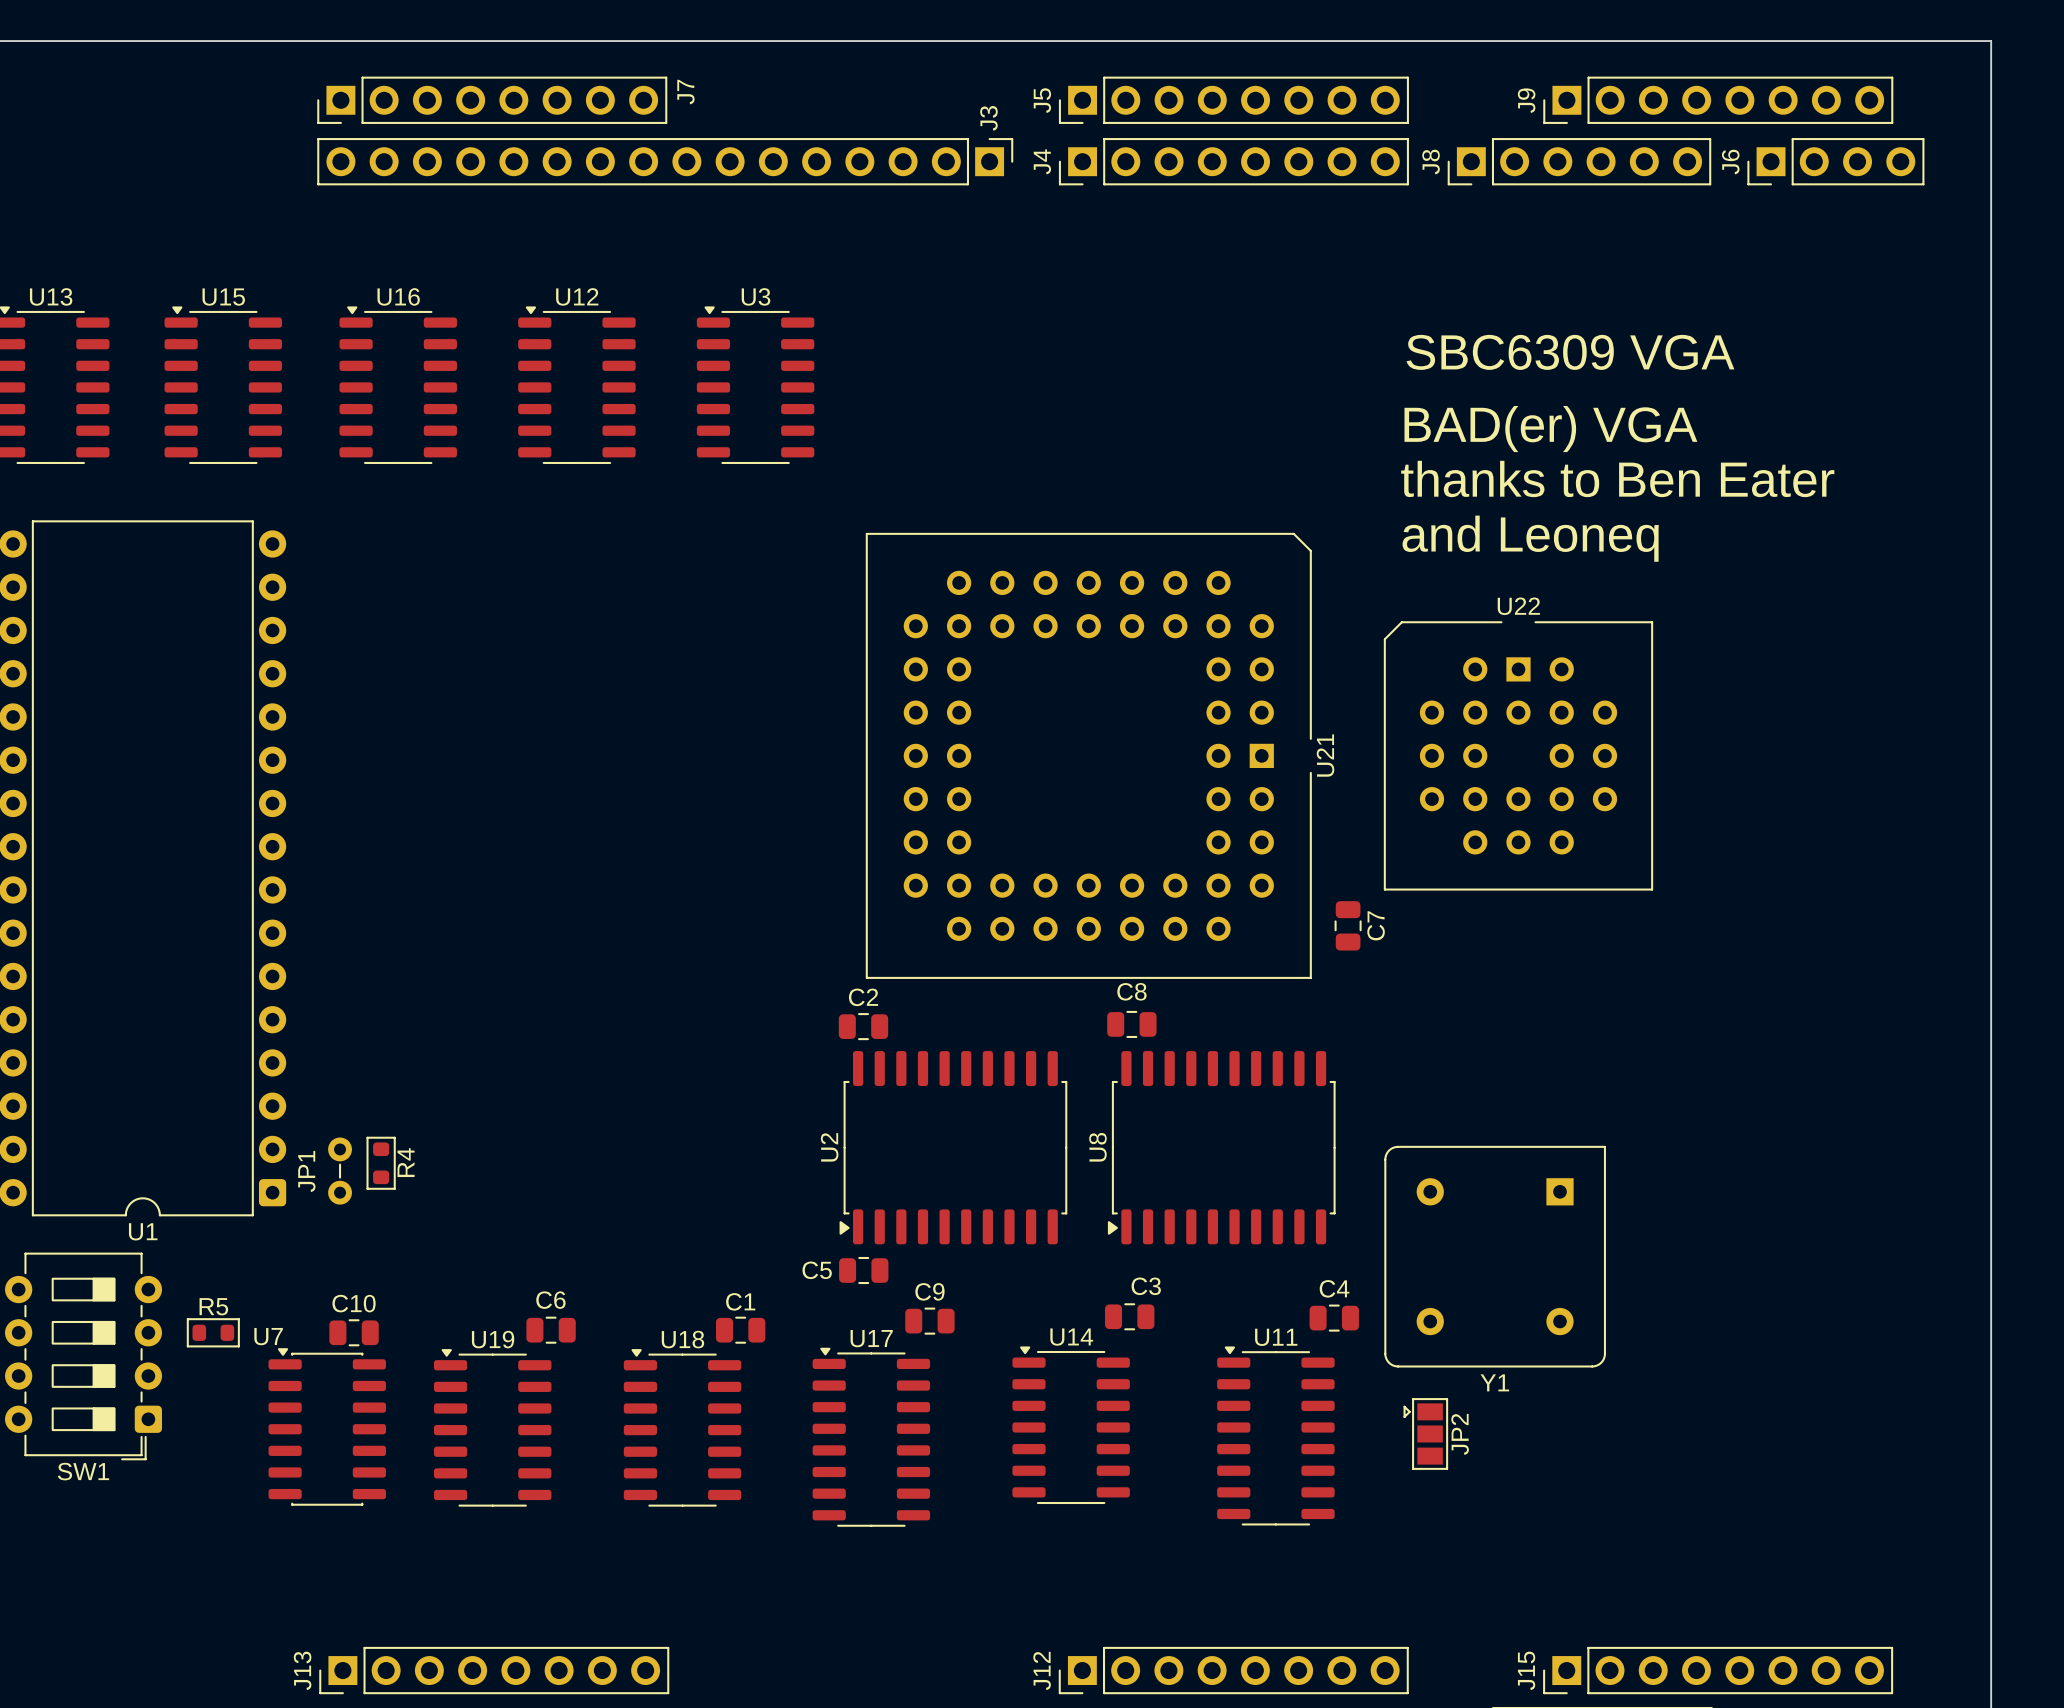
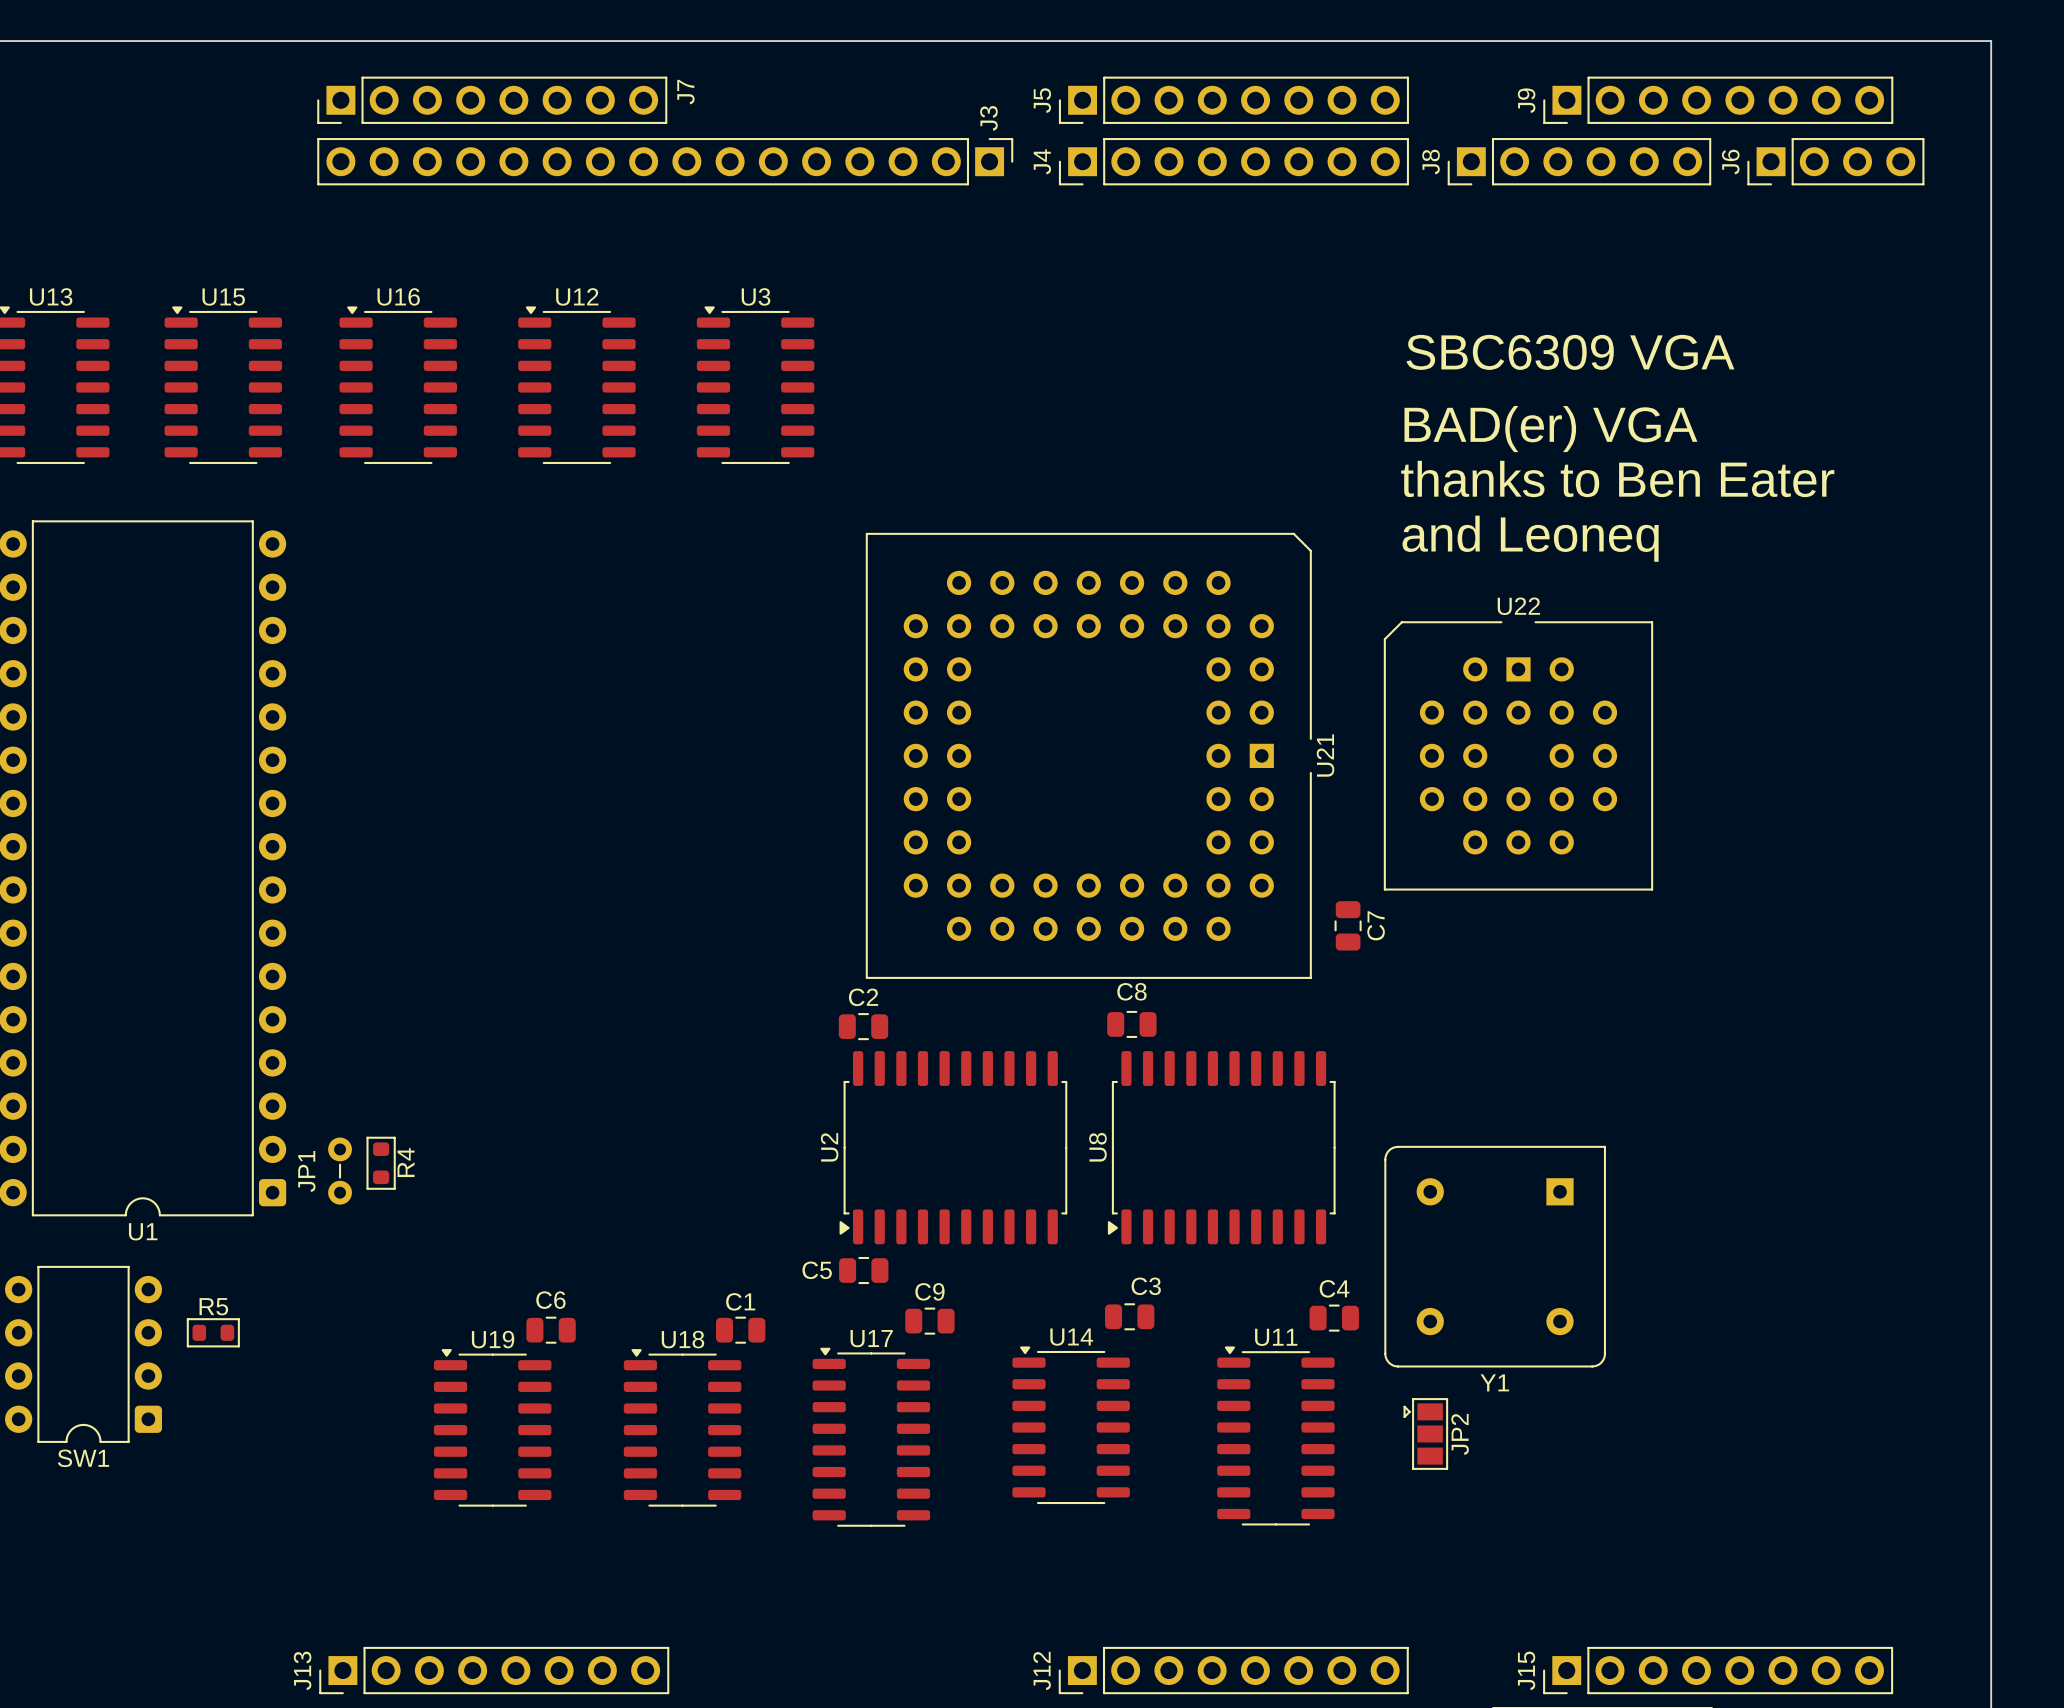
SW1 footprint: [5, 1252, 163, 1461] -> [5, 1265, 163, 1443]
C10: (354, 1332) -> none
U7: (327, 1426) -> none

